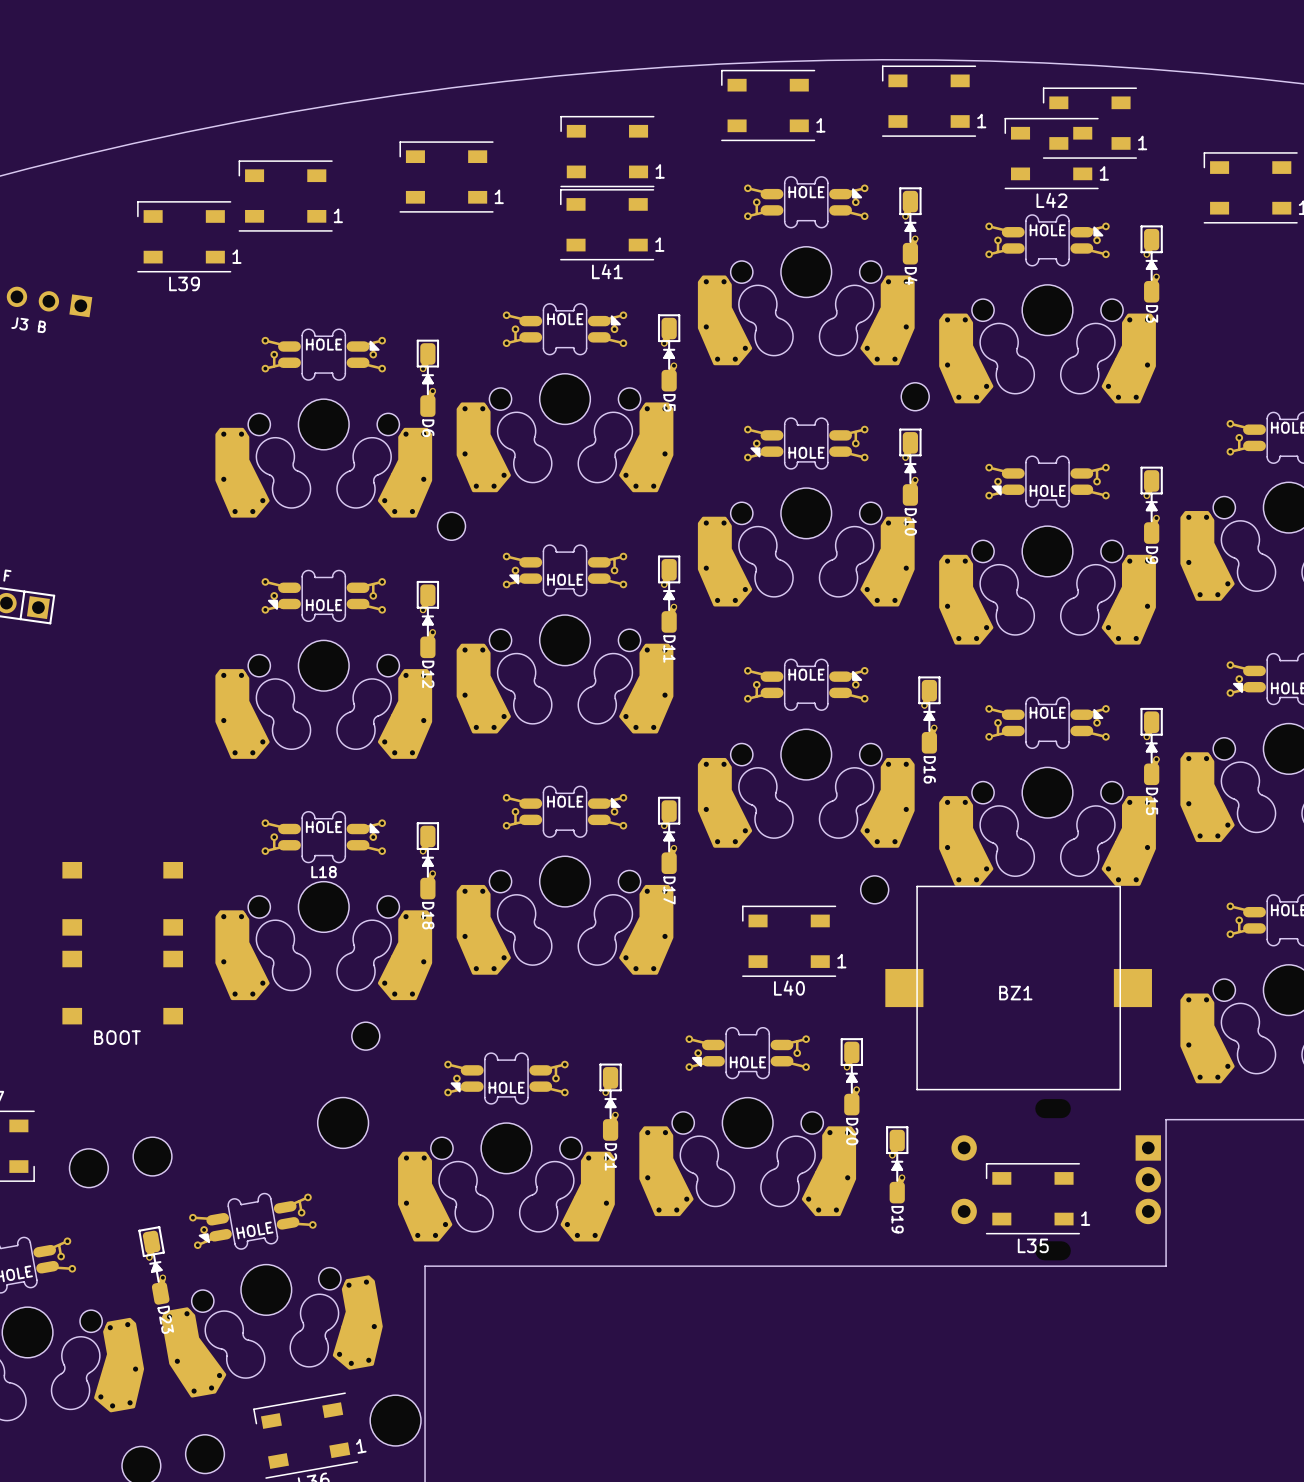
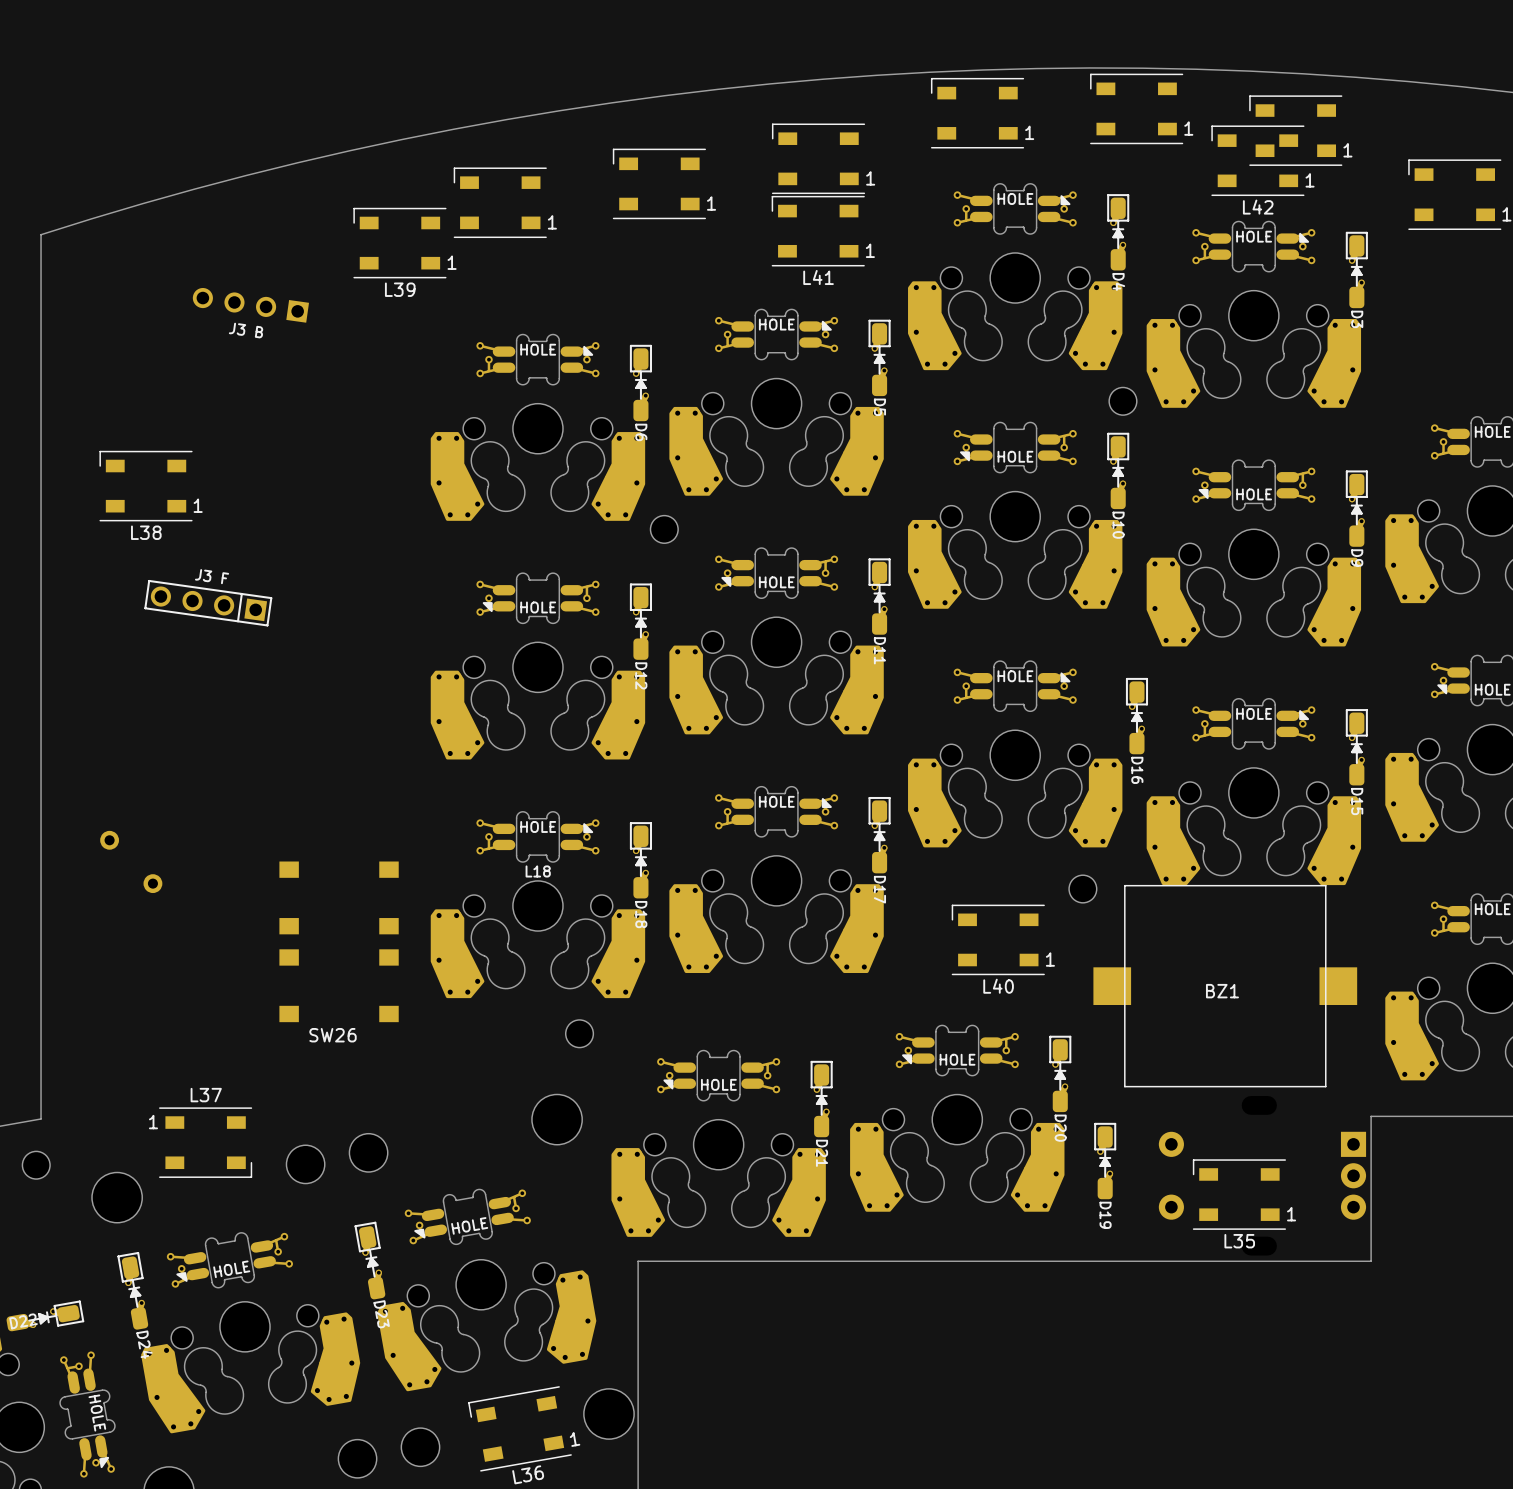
BOOT name: BOOT (117, 1037) -> SW26 (333, 1035)

